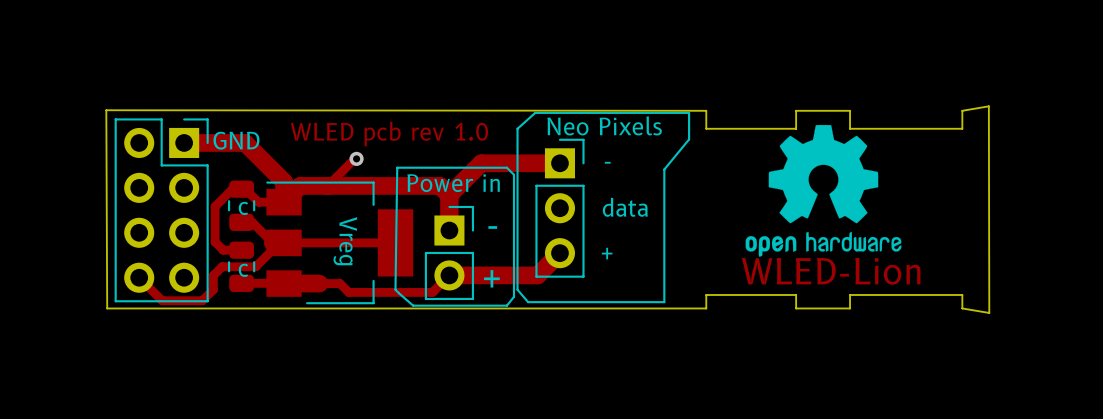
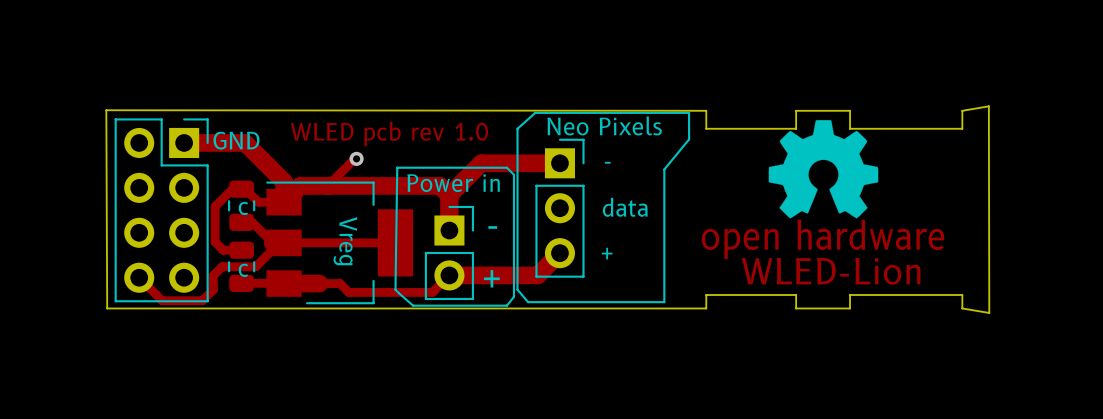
drawing: none -> [768, 120, 879, 219]
drawing: [745, 124, 902, 257] -> none
text: none -> open hardware (822, 239)

